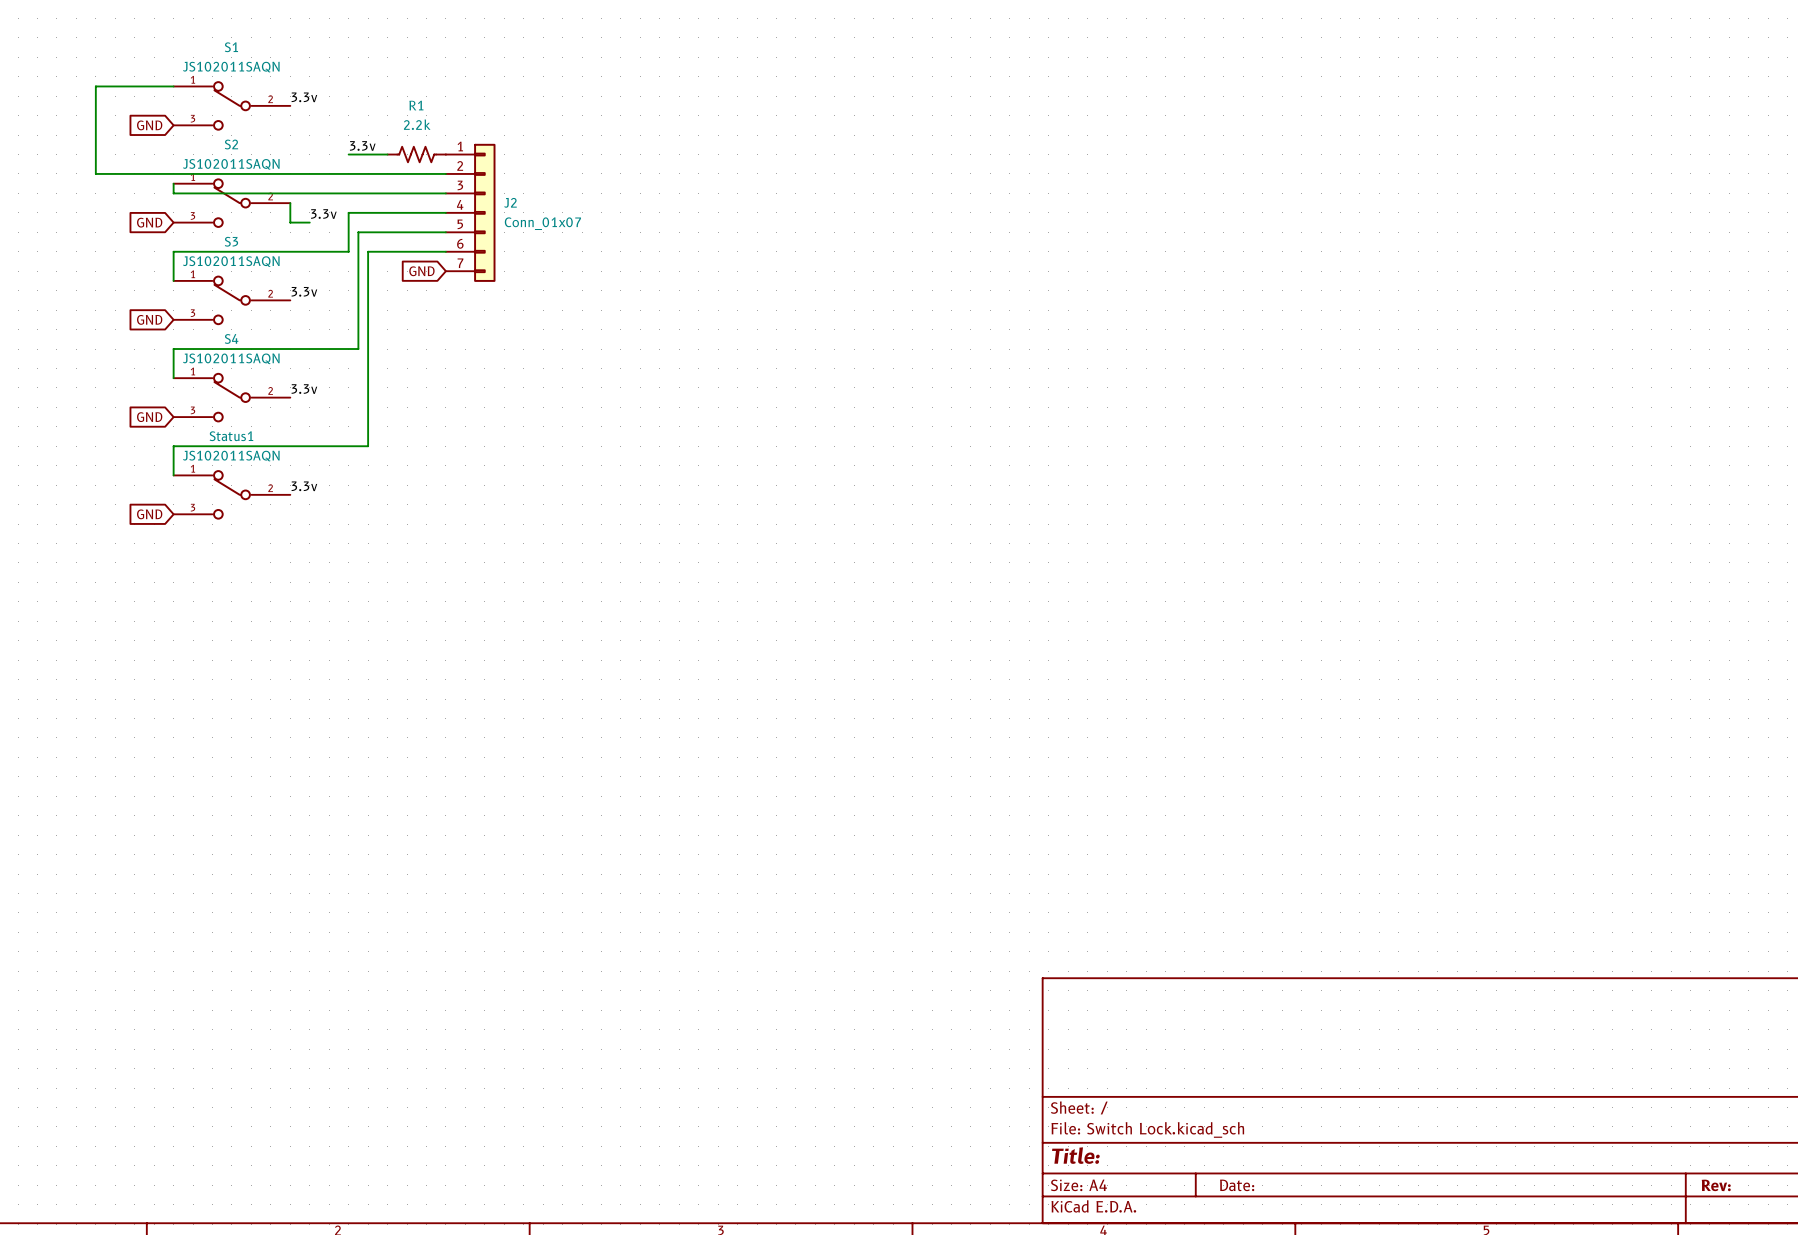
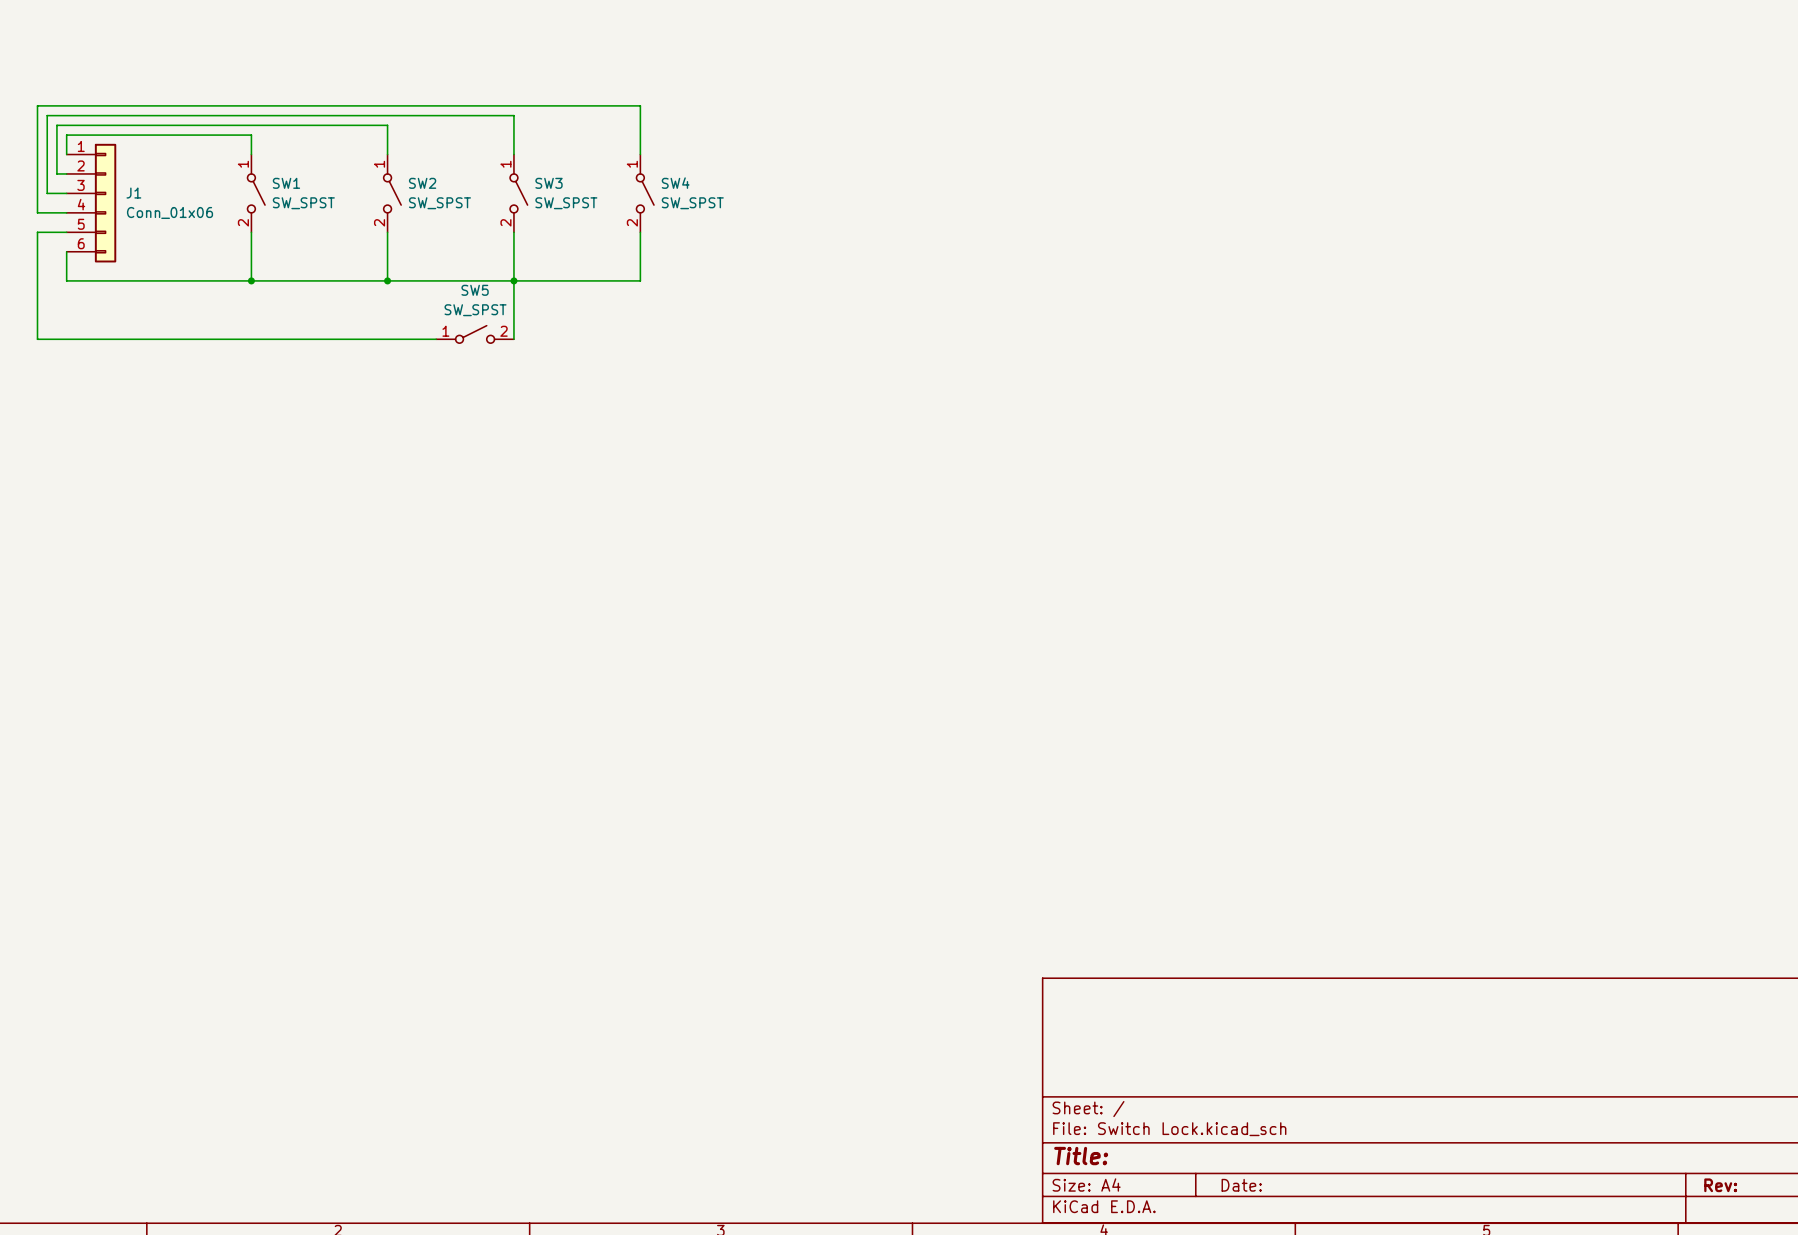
wire: (173, 86) (95, 86) (95, 173) (445, 173) -> none
label: 3.3v (304, 97) -> none
S1: JS102011SAQN (231, 105) -> none
global label: GND (149, 125) -> none
label: 3.3v (362, 145) -> none
wire: none -> (66, 154) (66, 135) (251, 135) (251, 154)
wire: (348, 154) (387, 154) -> (66, 173) (56, 173) (56, 125) (387, 125) (387, 154)
R1: 2.2k (416, 154) -> none
wire: none -> (513, 154) (513, 115) (47, 115) (47, 193) (66, 193)
wire: none -> (640, 154) (640, 105) (37, 105) (37, 212) (66, 212)
wire: (173, 183) (173, 193) (445, 193) -> none
SW1: none -> SW_SPST (256, 193)
SW2: none -> SW_SPST (392, 193)
SW3: none -> SW_SPST (518, 193)
SW4: none -> SW_SPST (645, 193)
J1: none -> Conn_01x06 (91, 203)
S2: JS102011SAQN (231, 203) -> none
wire: (290, 203) (290, 222) (309, 222) -> none
wire: (445, 212) (348, 212) (348, 251) (173, 251) (173, 280) -> none
J2: Conn_01x07 (470, 212) -> none
label: 3.3v (323, 214) -> none
global label: GND (149, 222) -> none
wire: none -> (66, 232) (37, 232) (37, 339) (436, 339)
wire: none -> (251, 232) (251, 280)
wire: none -> (387, 232) (387, 280)
wire: (445, 232) (358, 232) (358, 349) (173, 349) (173, 378) -> none
wire: none -> (513, 232) (513, 339)
wire: none -> (640, 232) (640, 280) (66, 280) (66, 251)
wire: (445, 251) (368, 251) (368, 446) (173, 446) (173, 475) -> none
global label: GND (421, 271) -> none
junction: none -> (251, 280)
junction: none -> (387, 280)
junction: none -> (513, 280)
label: 3.3v (304, 291) -> none
S3: JS102011SAQN (231, 300) -> none
global label: GND (149, 319) -> none
SW5: none -> SW_SPST (475, 334)
label: 3.3v (304, 389) -> none
S4: JS102011SAQN (231, 397) -> none
global label: GND (149, 417) -> none
label: 3.3v (304, 486) -> none
Status1: JS102011SAQN (231, 494) -> none
global label: GND (149, 514) -> none

